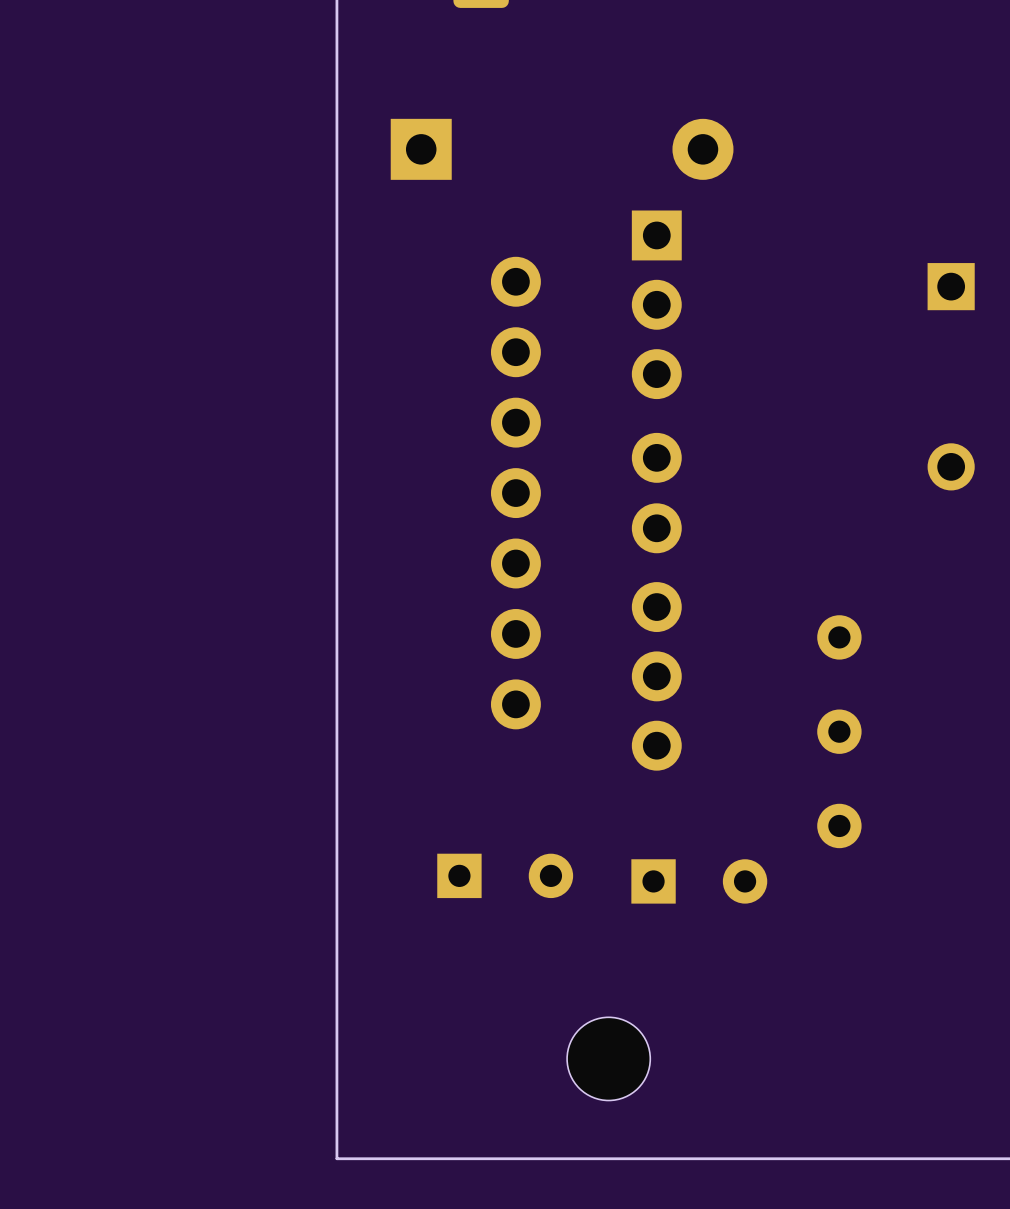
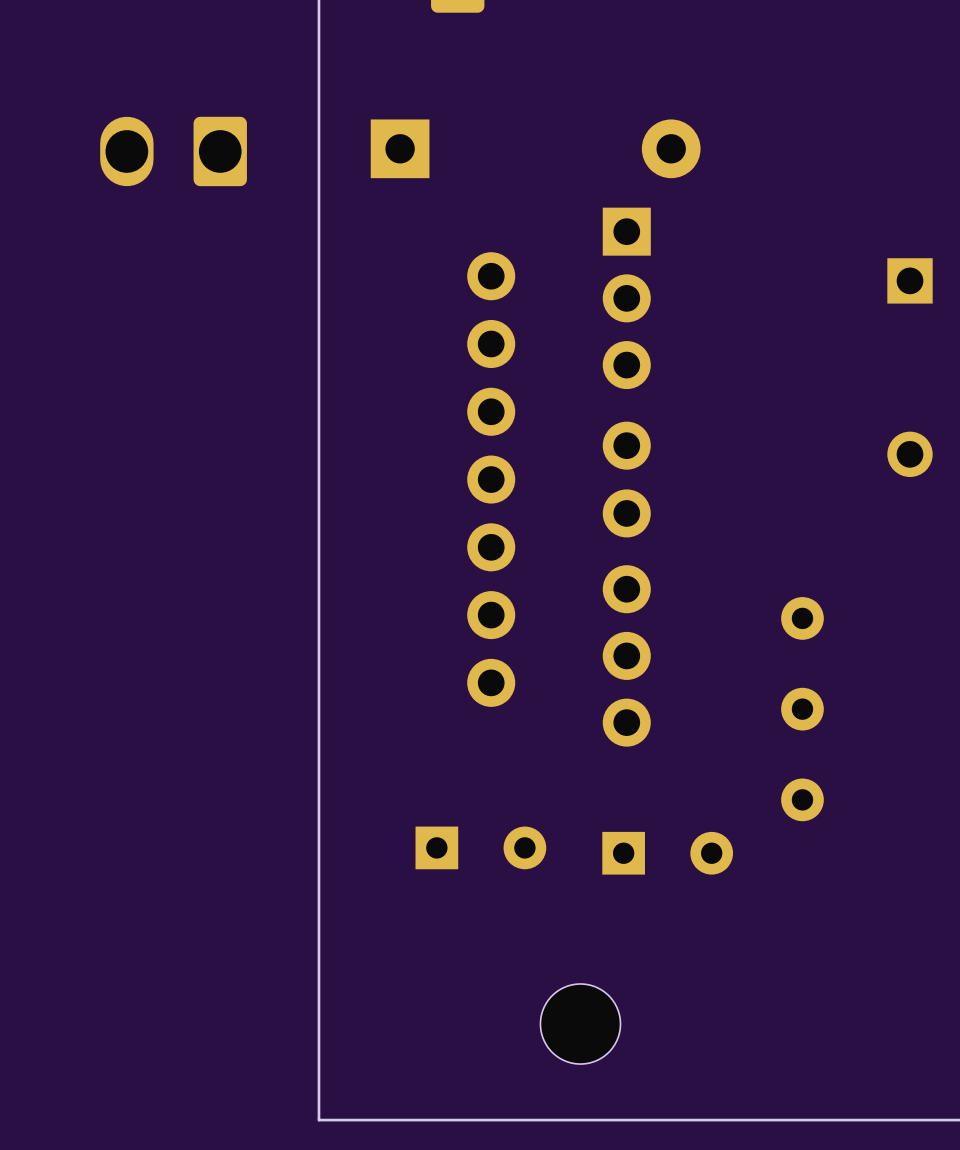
part: none -> (173, 151)

